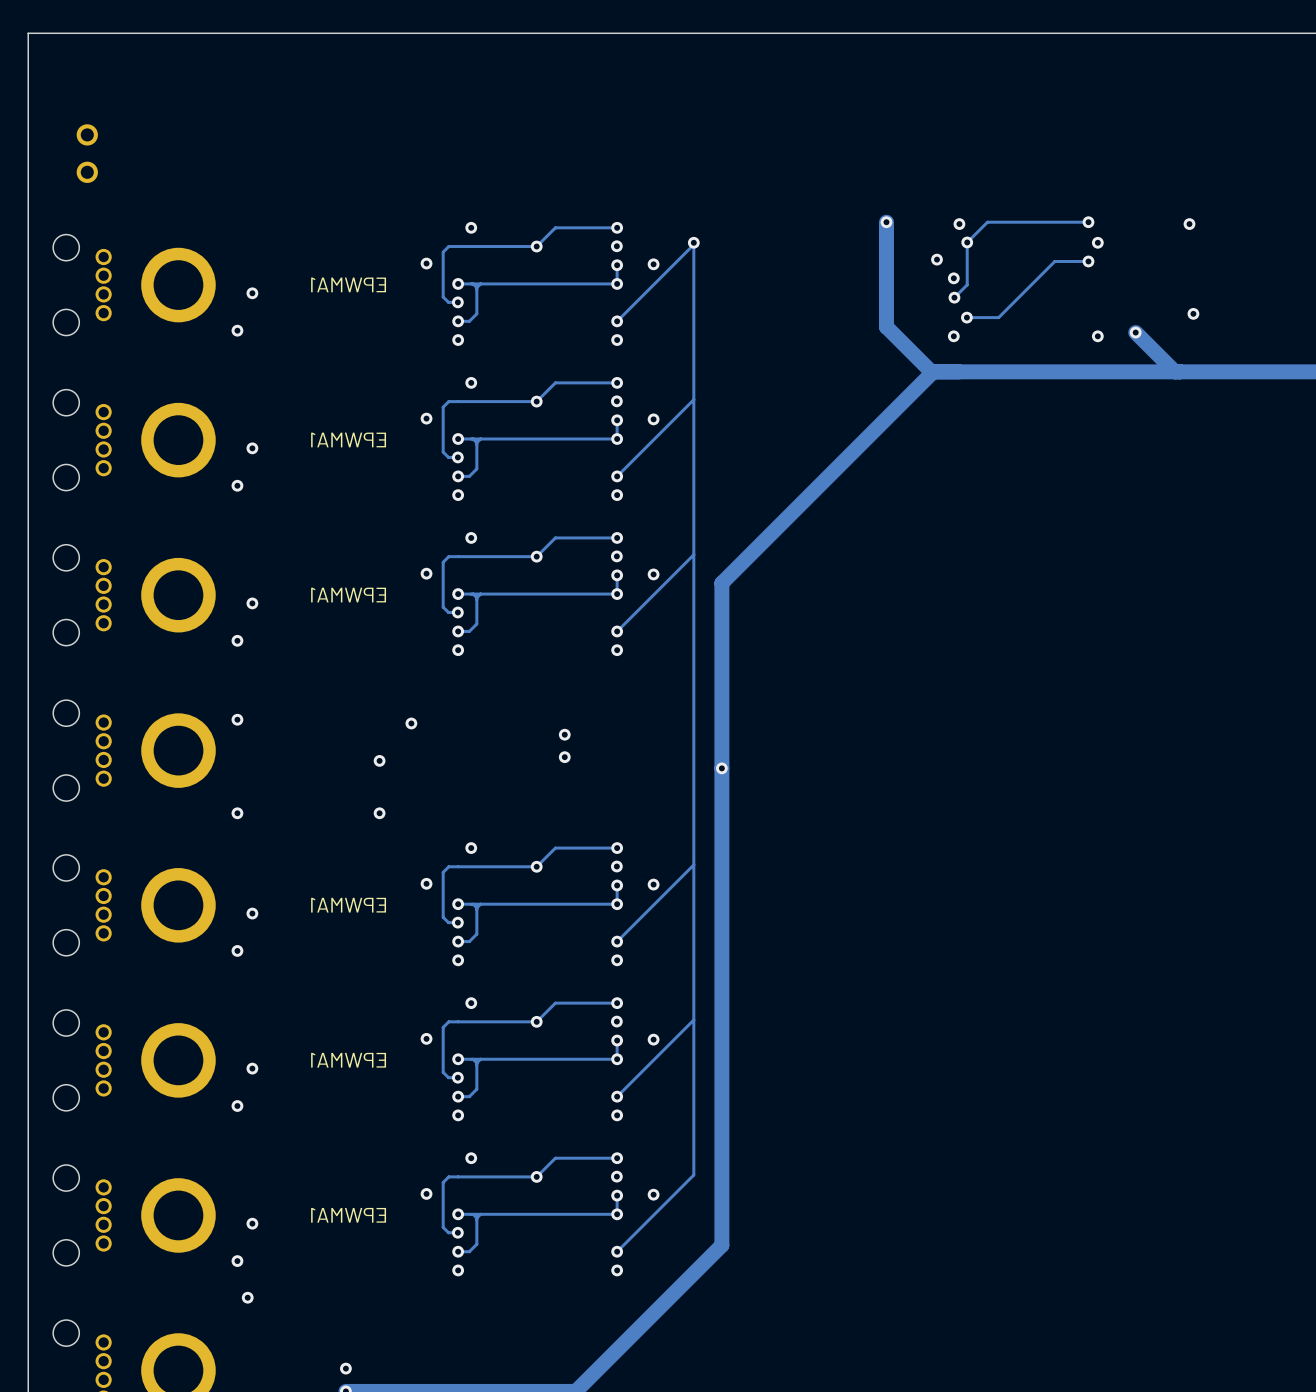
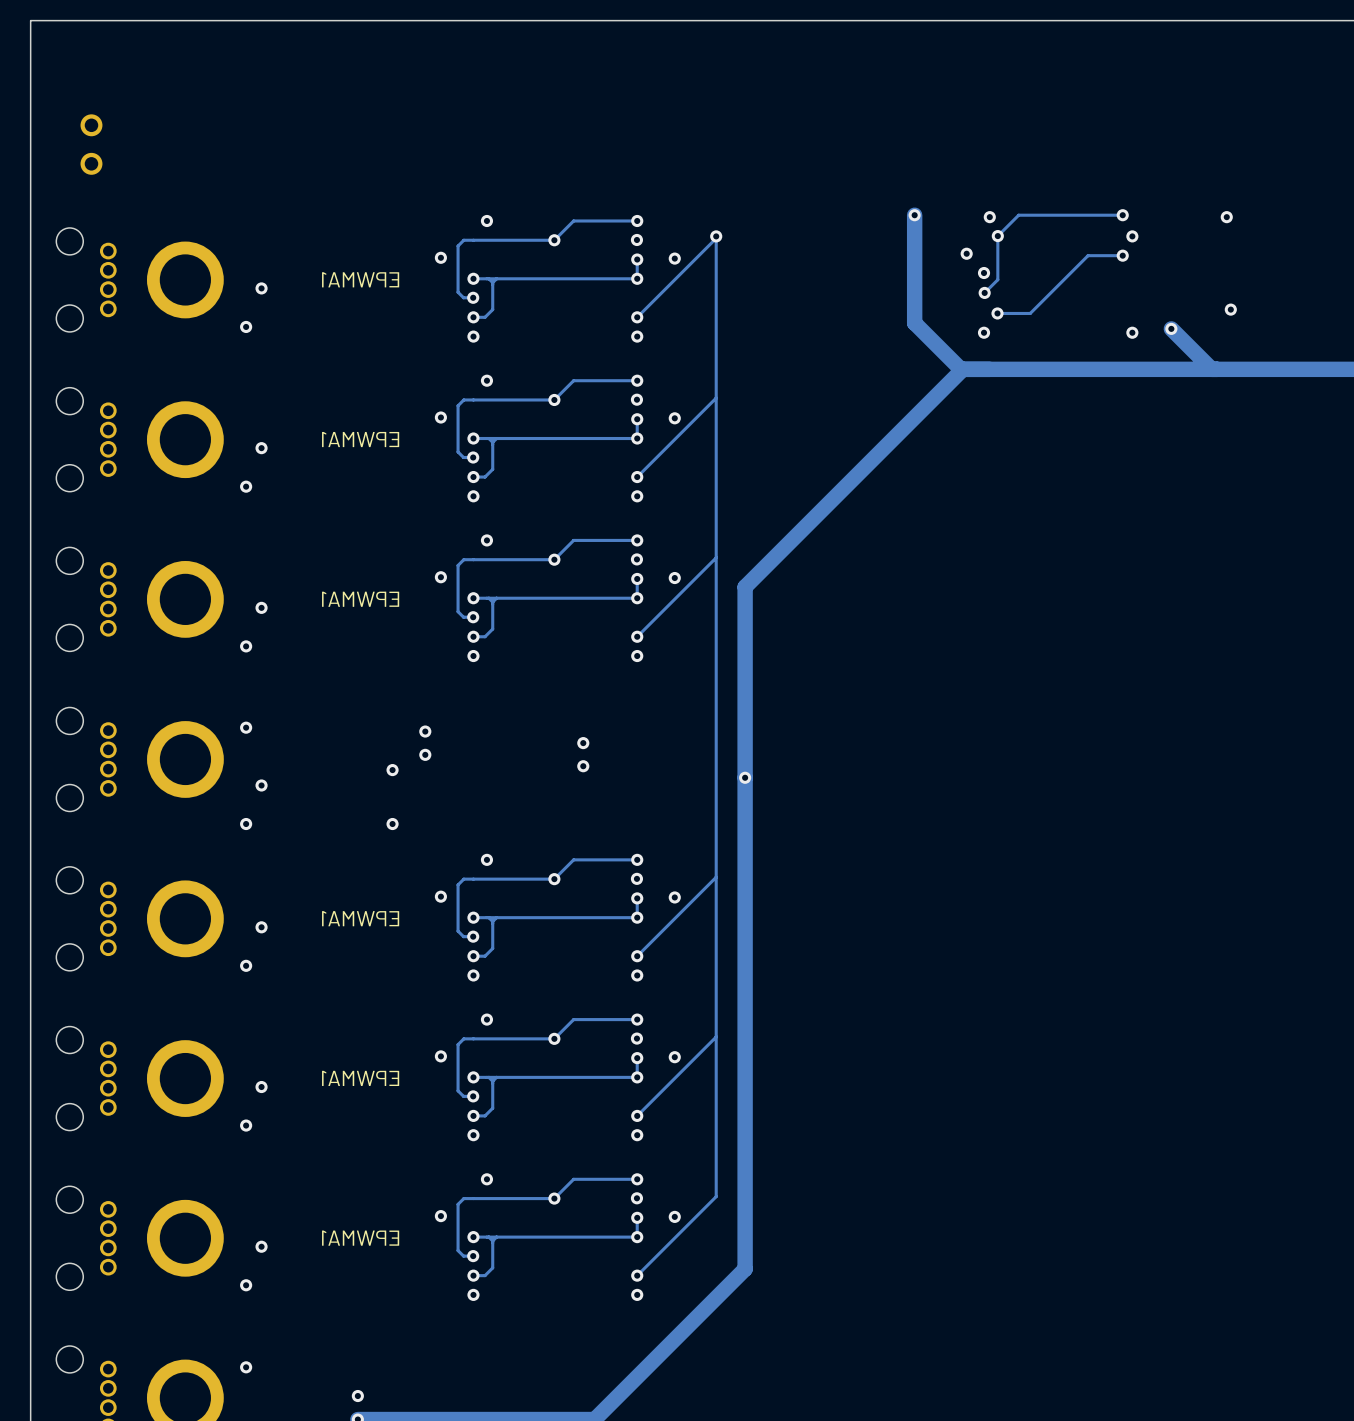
via: none -> (425, 754)
via: none -> (261, 785)
via position: (247, 1297) -> (246, 1367)

